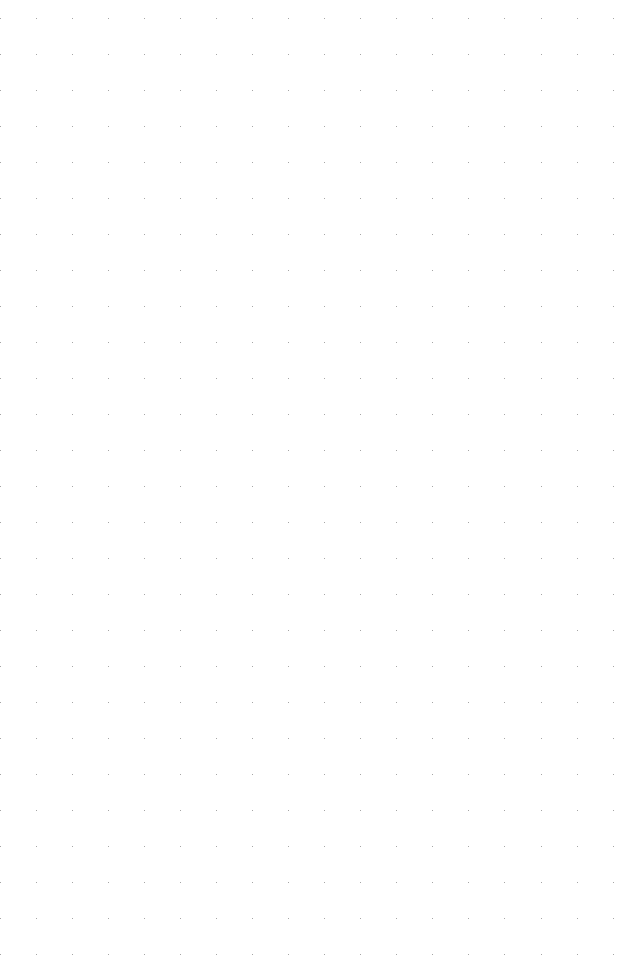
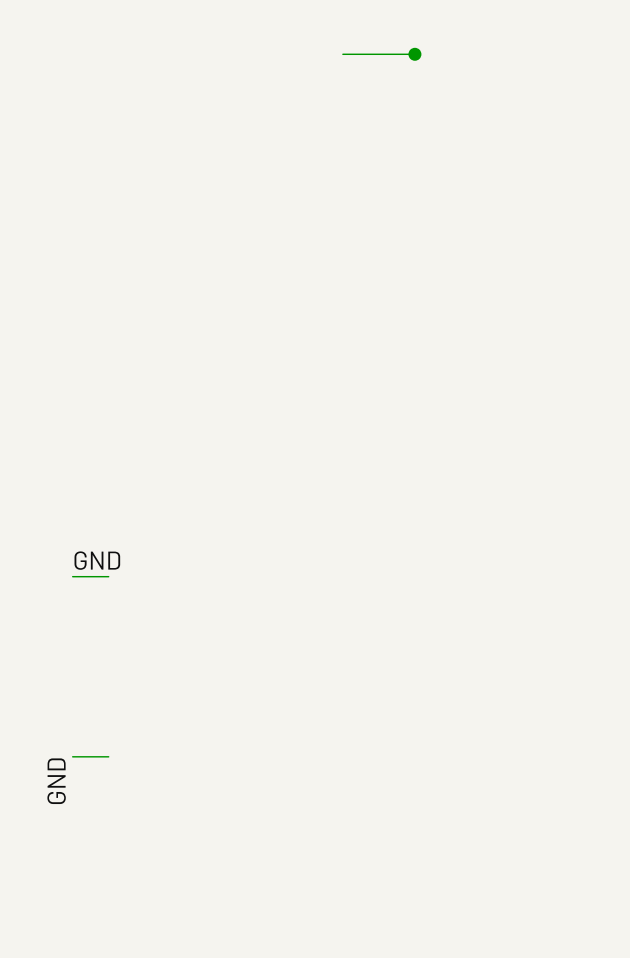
wire: none -> (342, 54) (414, 54)
junction: none -> (414, 54)
label: none -> GND (97, 560)
wire: none -> (72, 576) (108, 576)
wire: none -> (72, 756) (108, 756)
label: none -> GND (56, 781)

